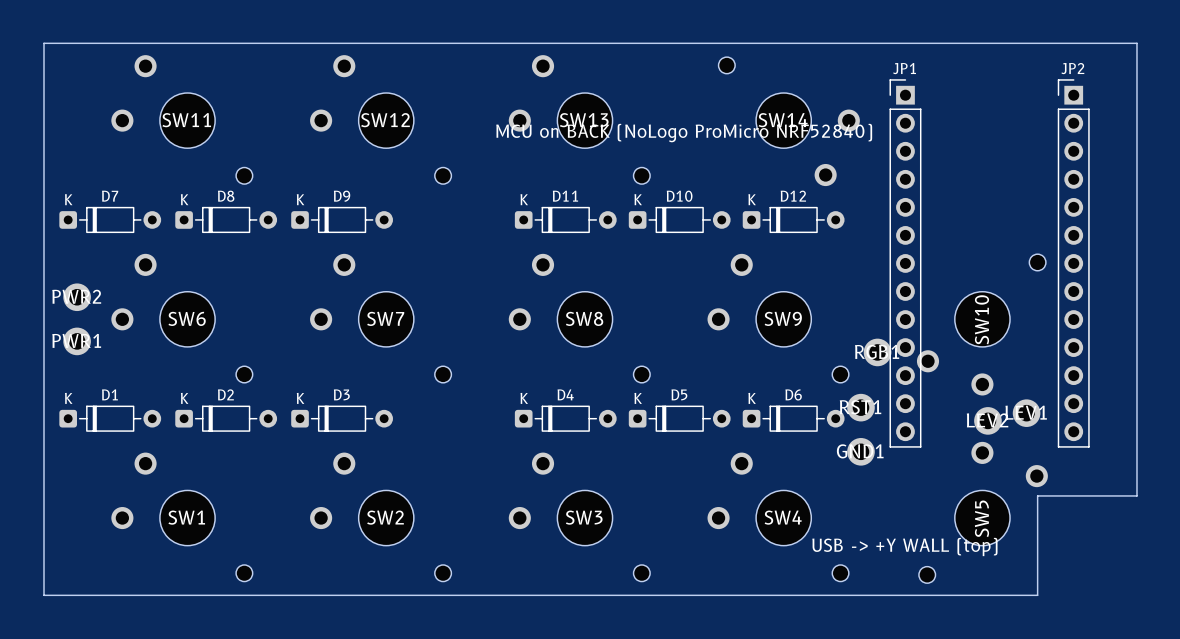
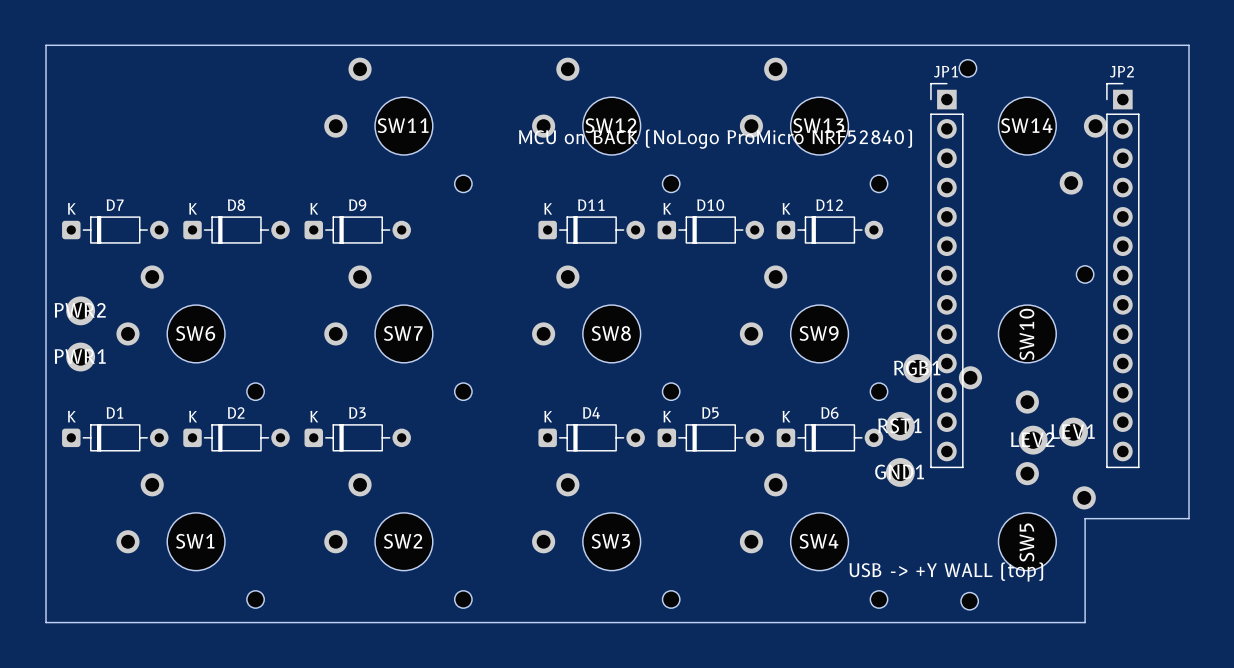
SW11: (182, 119) -> none
SW13: none -> (813, 125)
SW12 name: SW12 (385, 120) -> SW11 (403, 125)
SW13 name: SW13 (584, 120) -> SW12 (610, 125)
SW14 position: (789, 121) -> (1033, 127)

